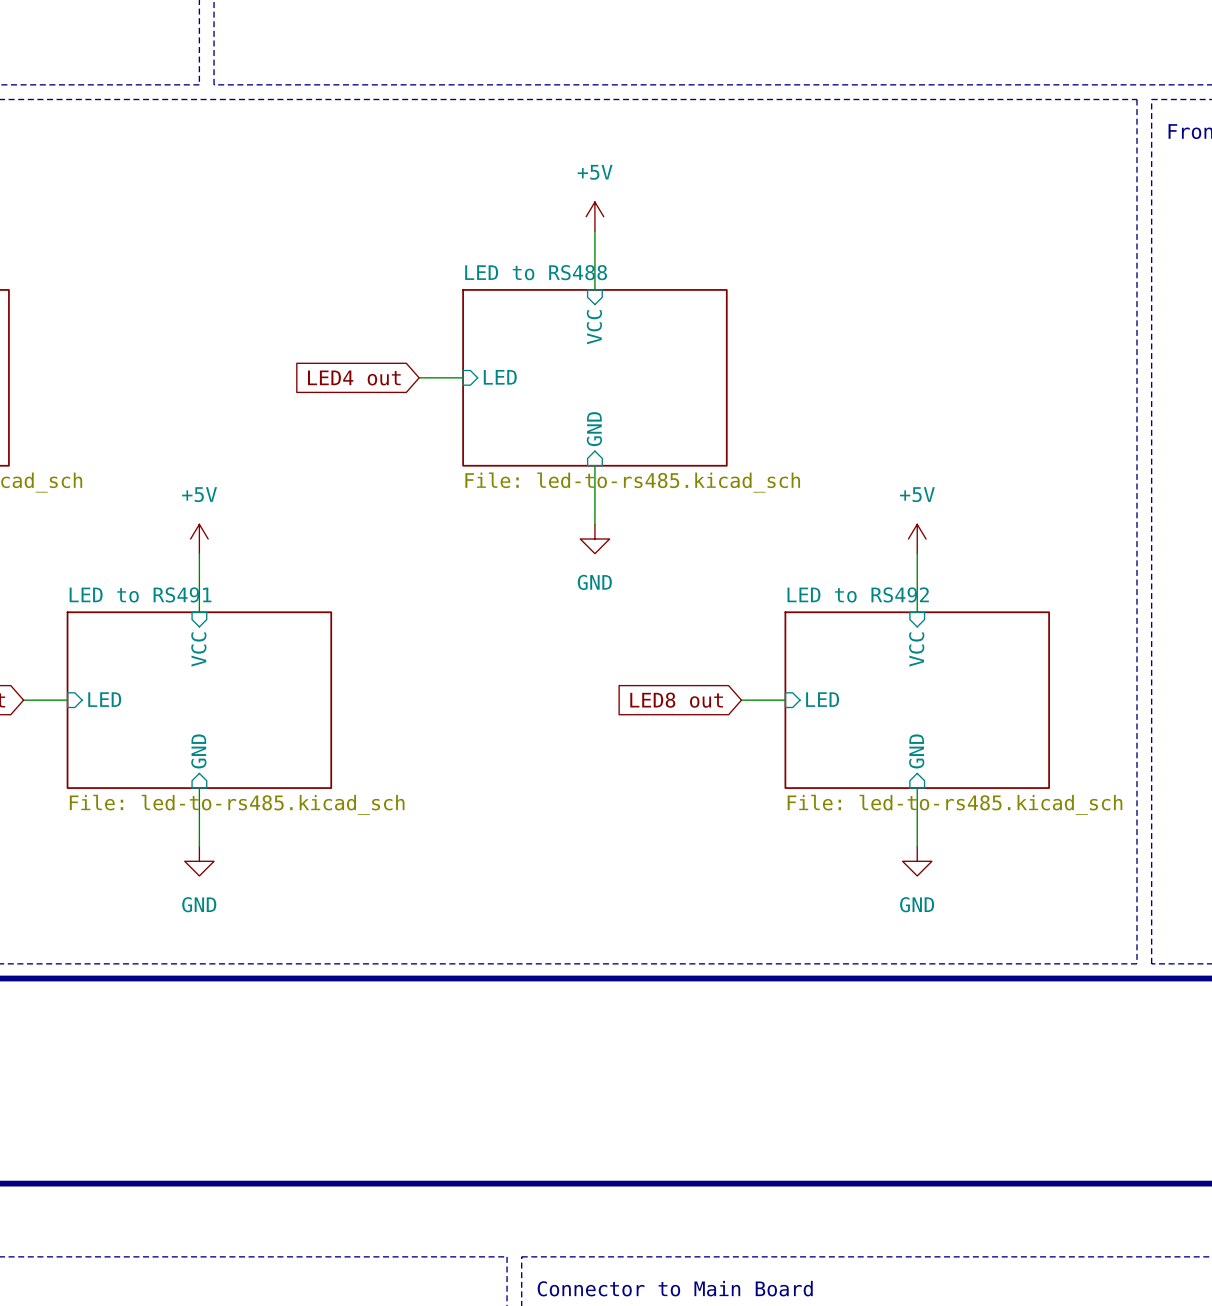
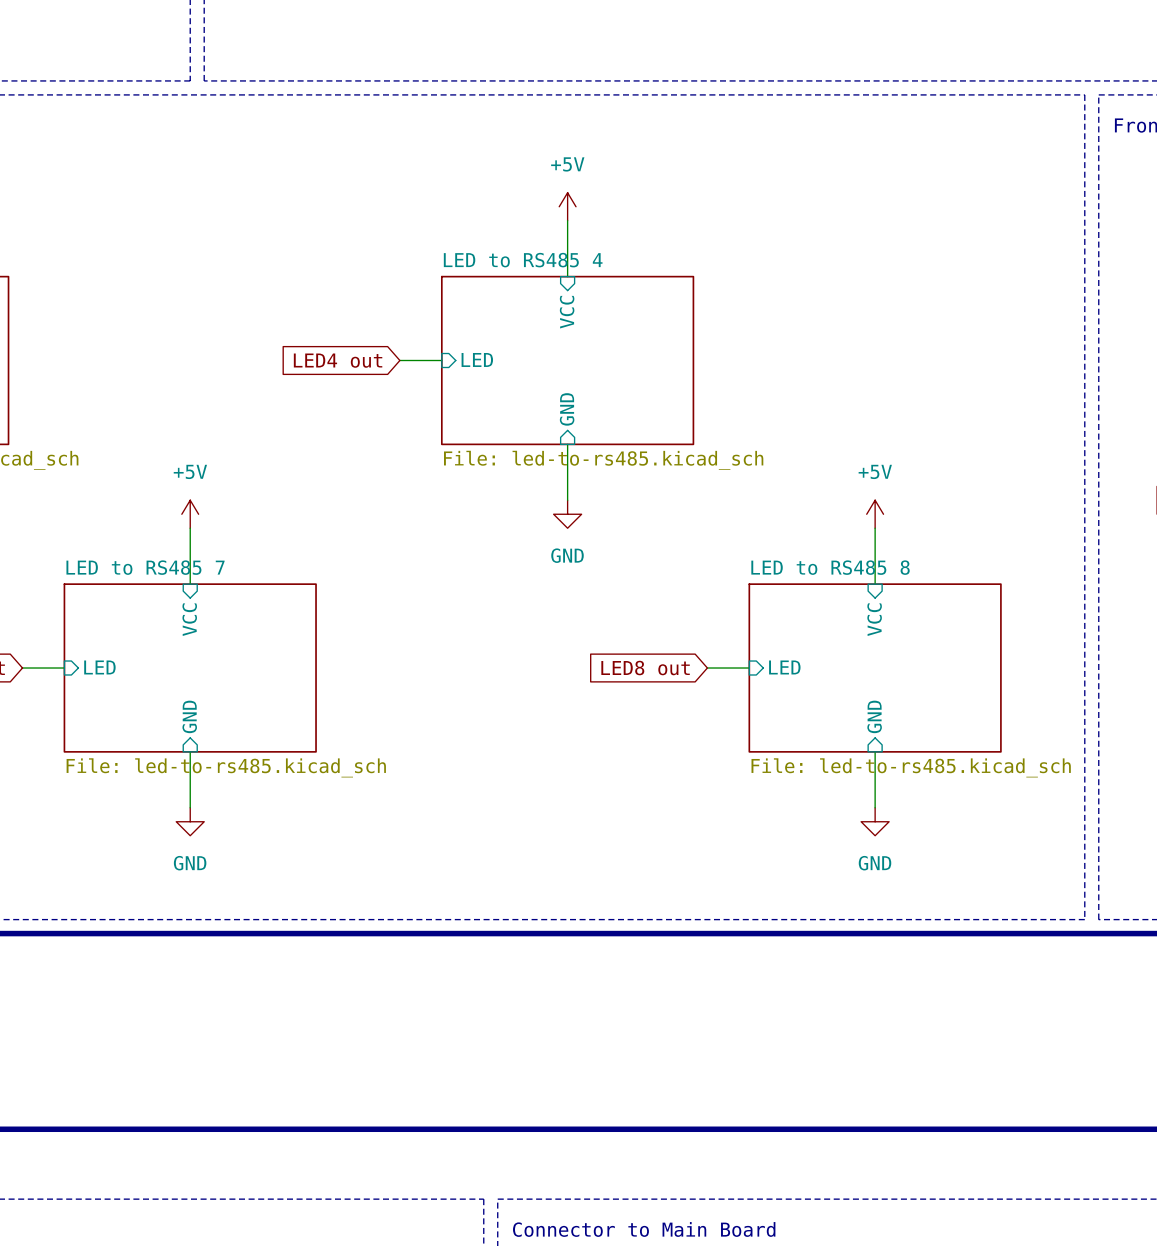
sheet LED to RS488 name: LED to RS488 (536, 272) -> LED to RS485 4 (523, 260)
sheet LED to RS491 name: LED to RS491 (140, 594) -> LED to RS485 7 (145, 567)
sheet LED to RS492 name: LED to RS492 (858, 594) -> LED to RS485 8 (830, 567)

